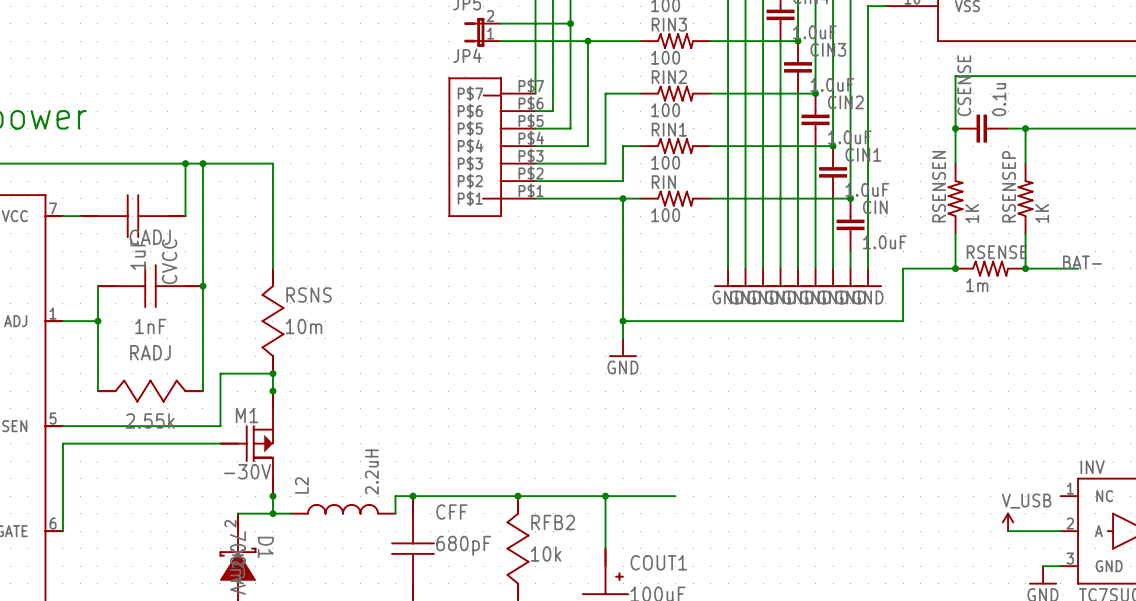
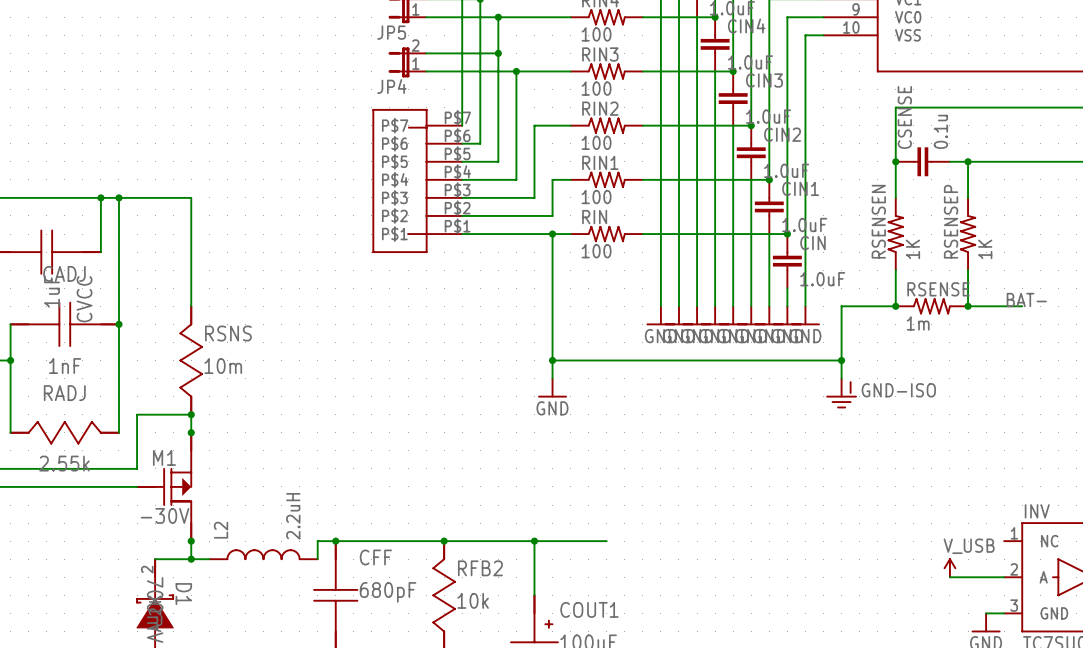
wire: none -> (841, 360) (841, 378)
junction: none -> (841, 360)
power symbol: none -> GND-ISO (841, 393)

